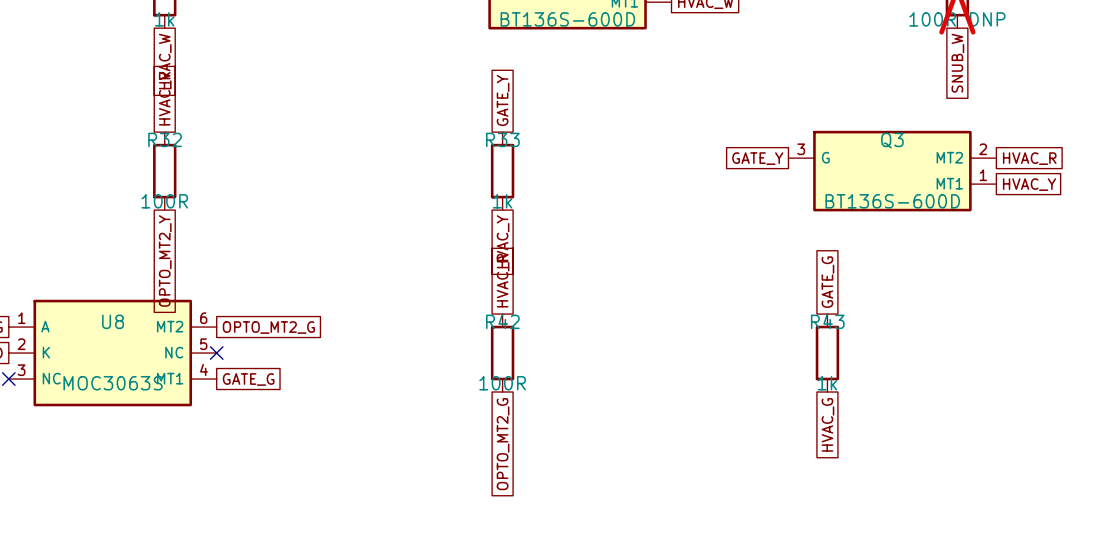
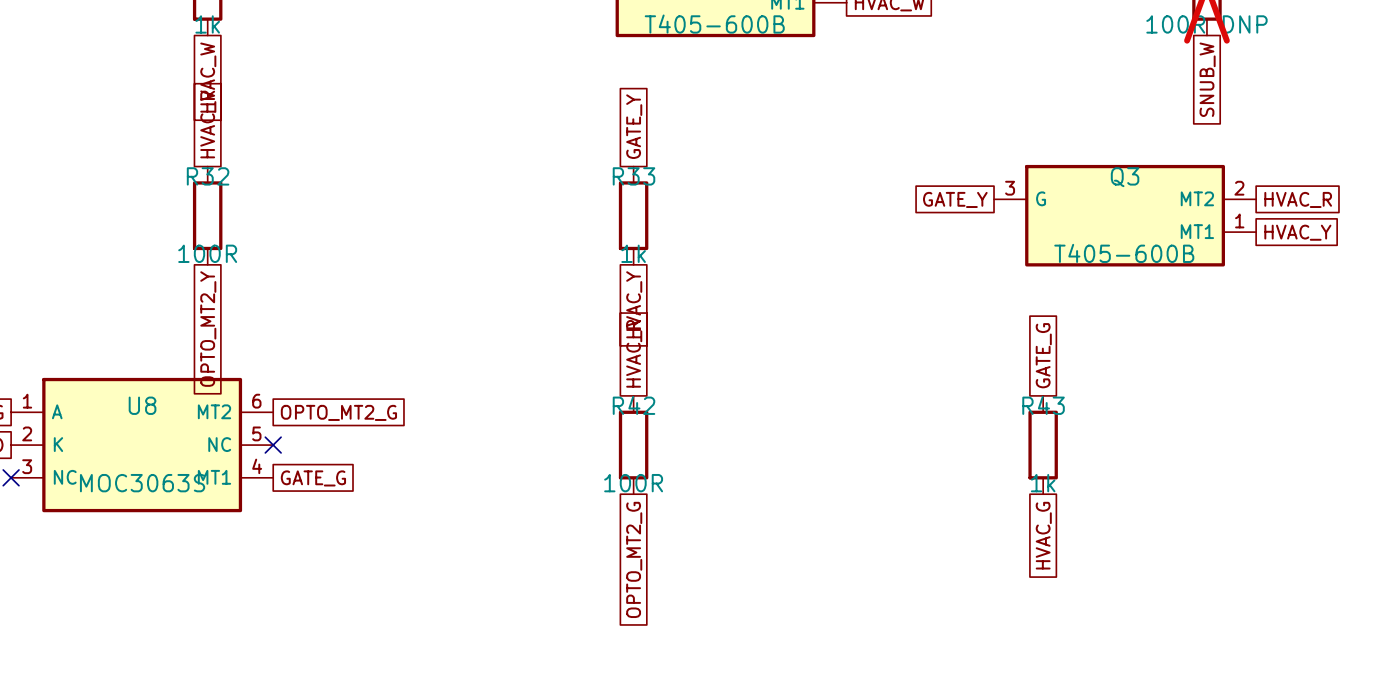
part value: BT136S-600D (567, 19) -> T405-600B (714, 24)
Q3 value: BT136S-600D (892, 201) -> T405-600B (1124, 253)

